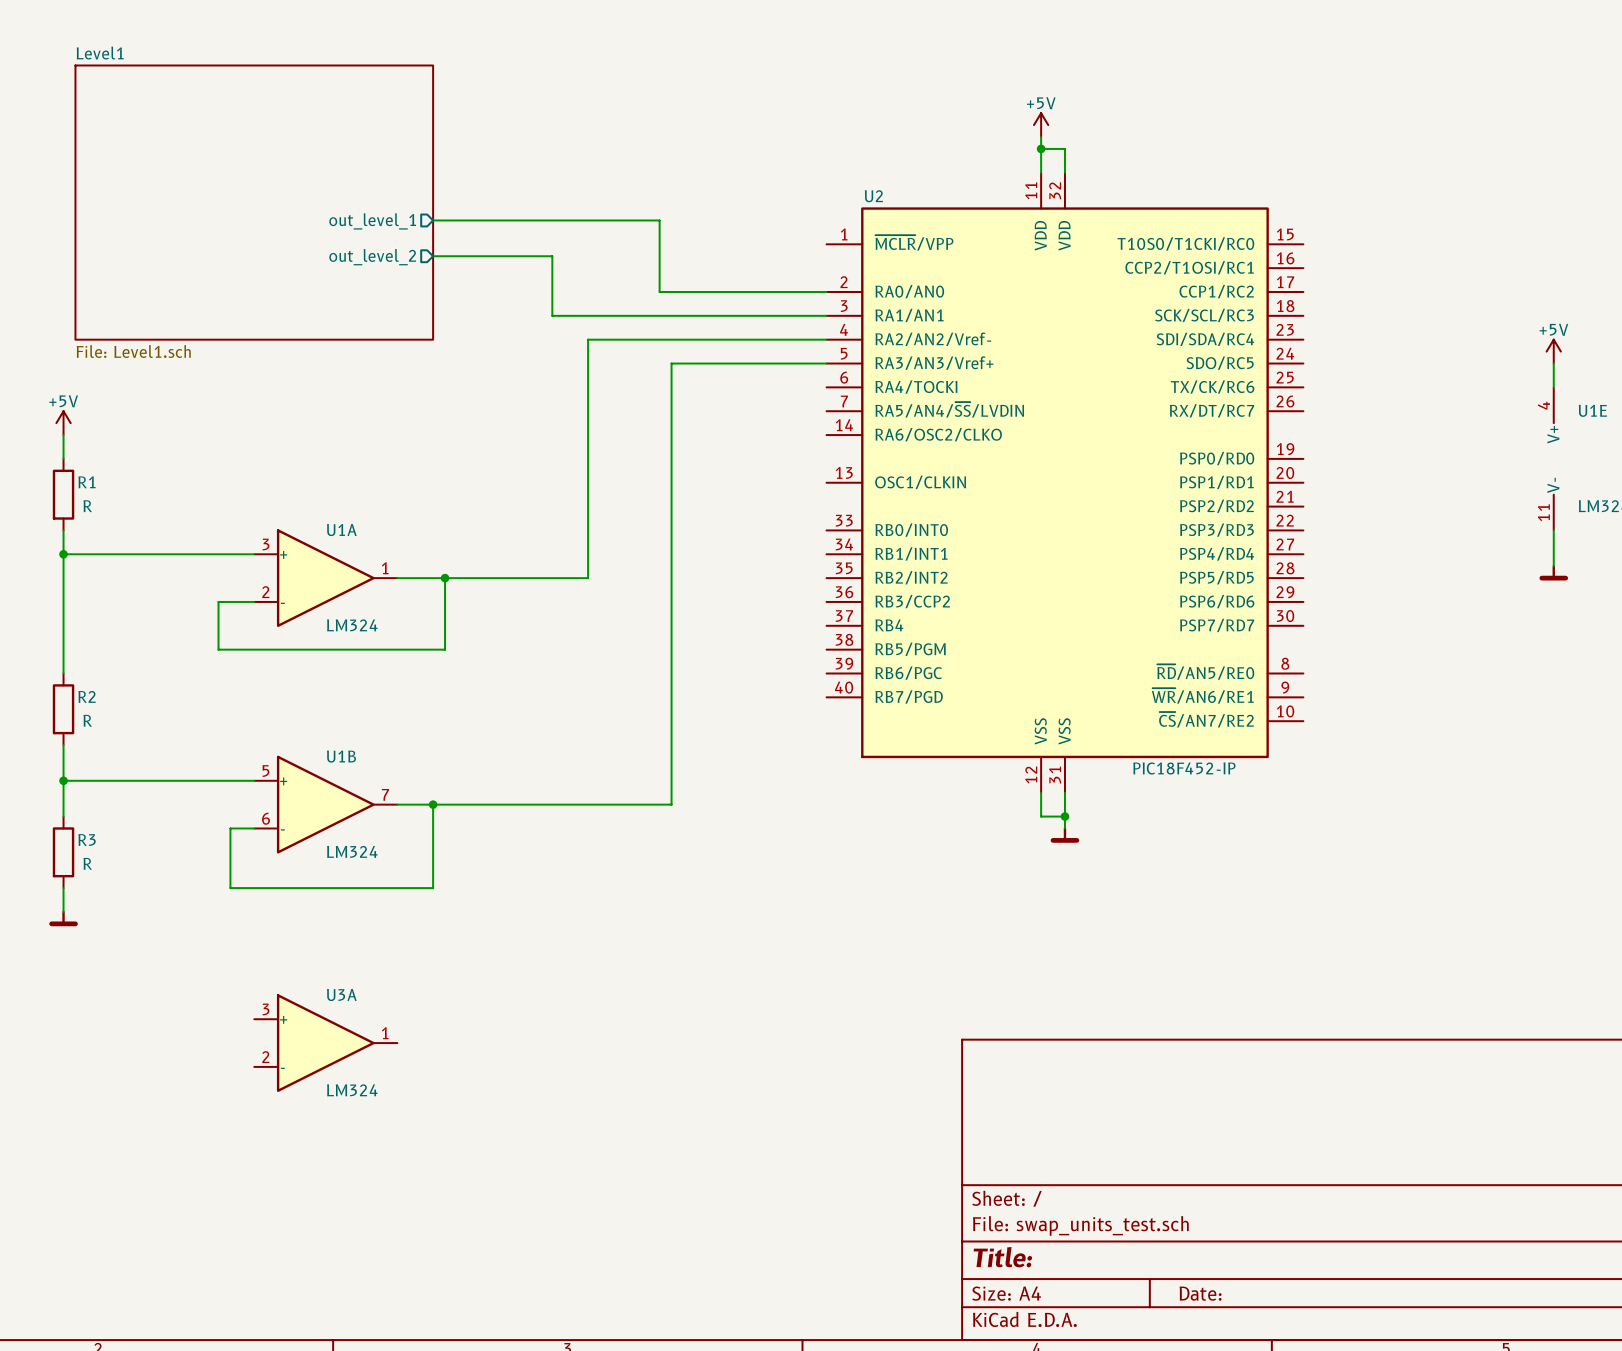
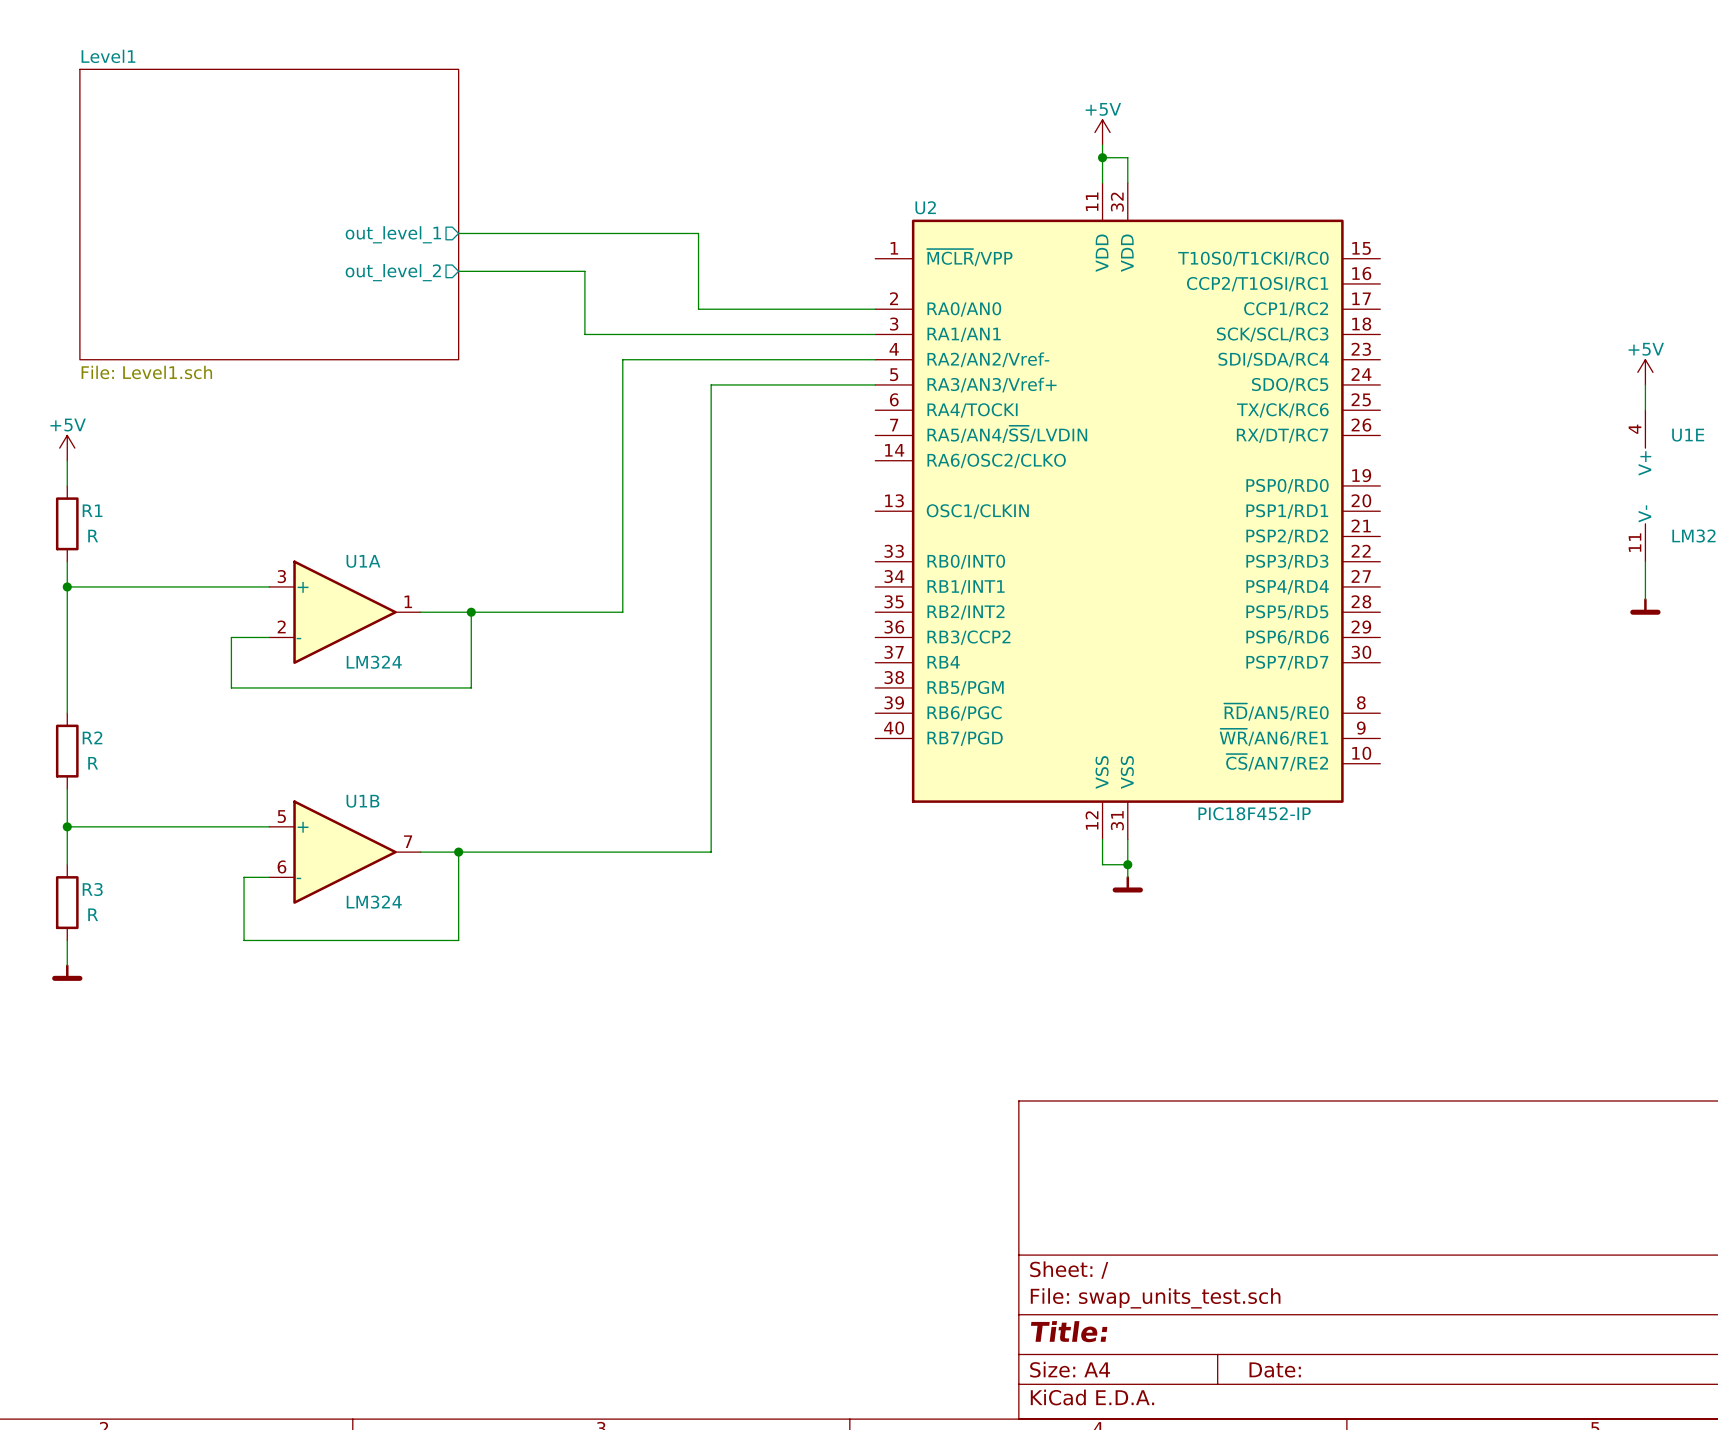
U3A: LM324 (325, 1043) -> none

